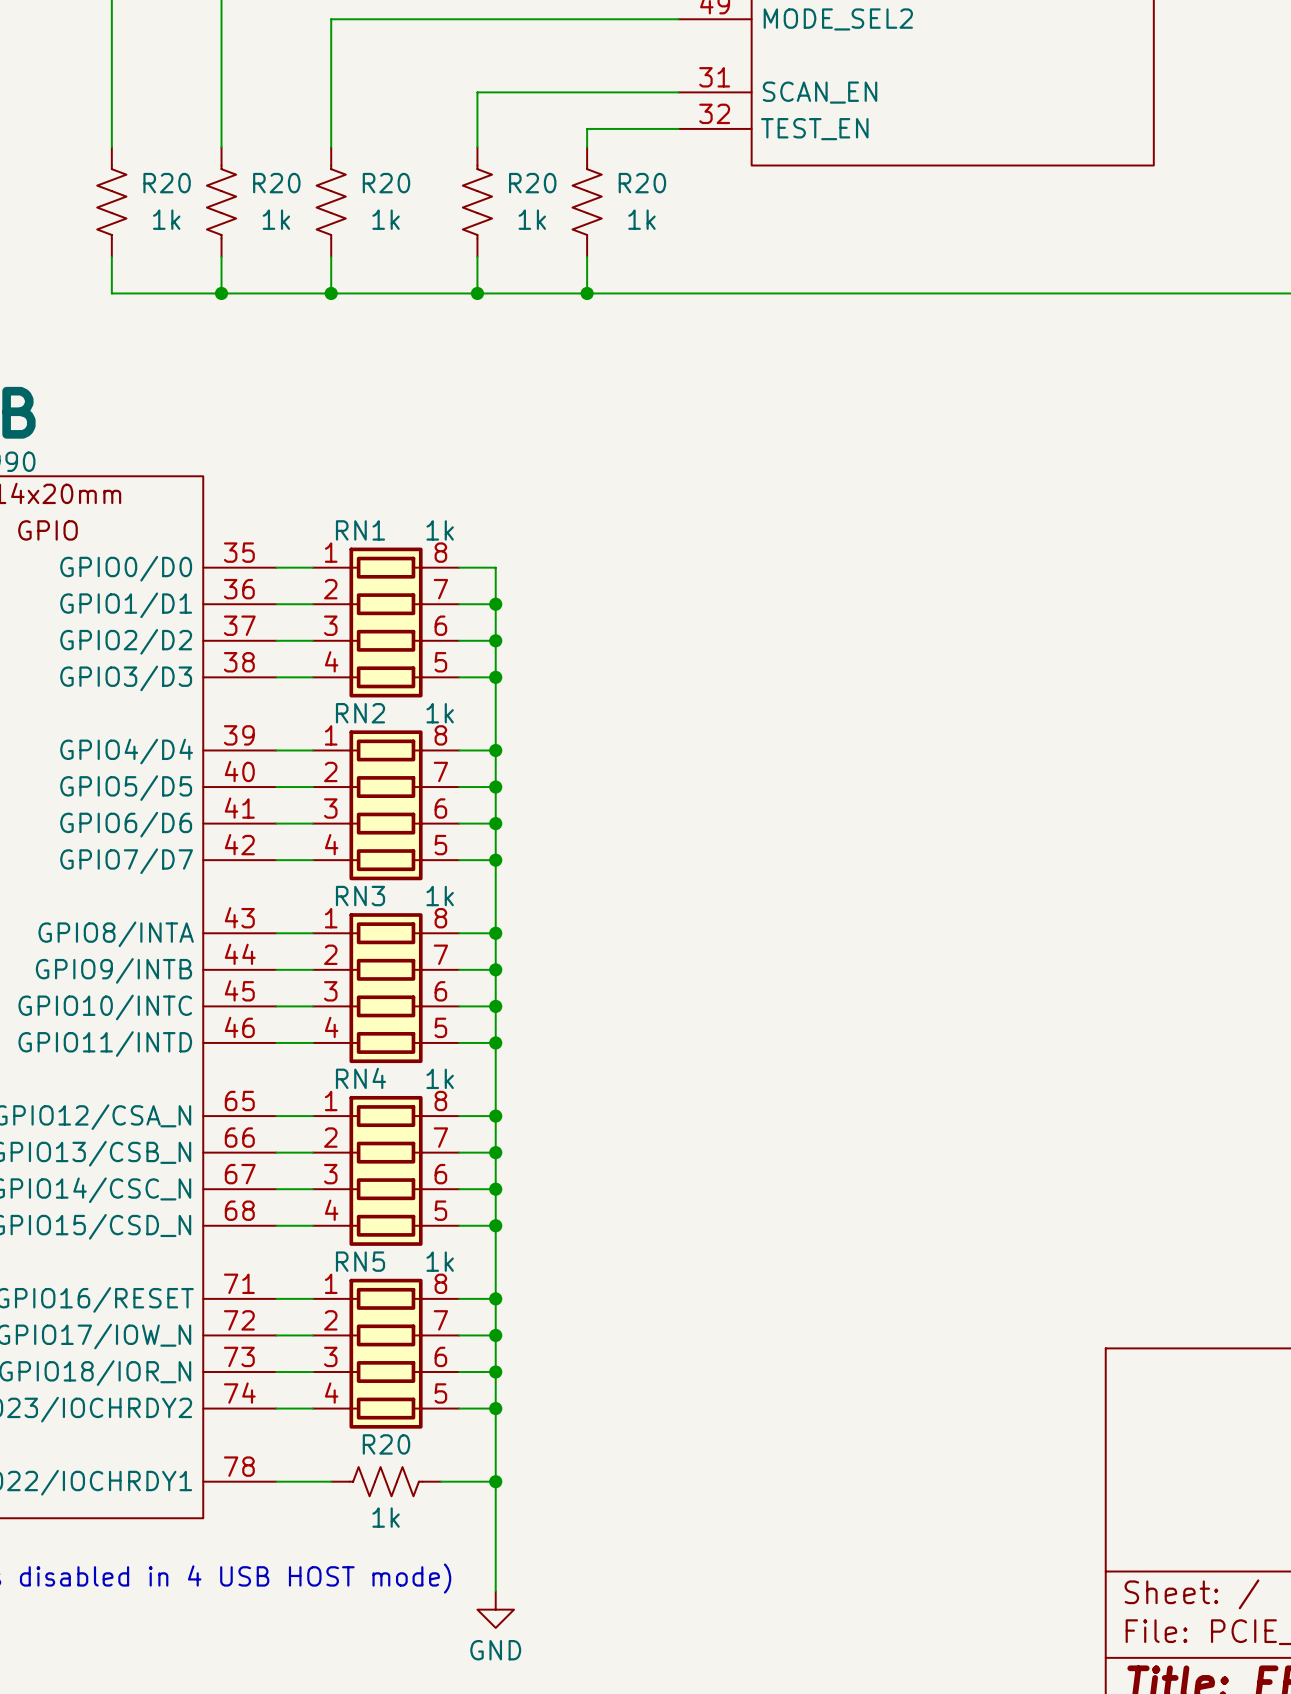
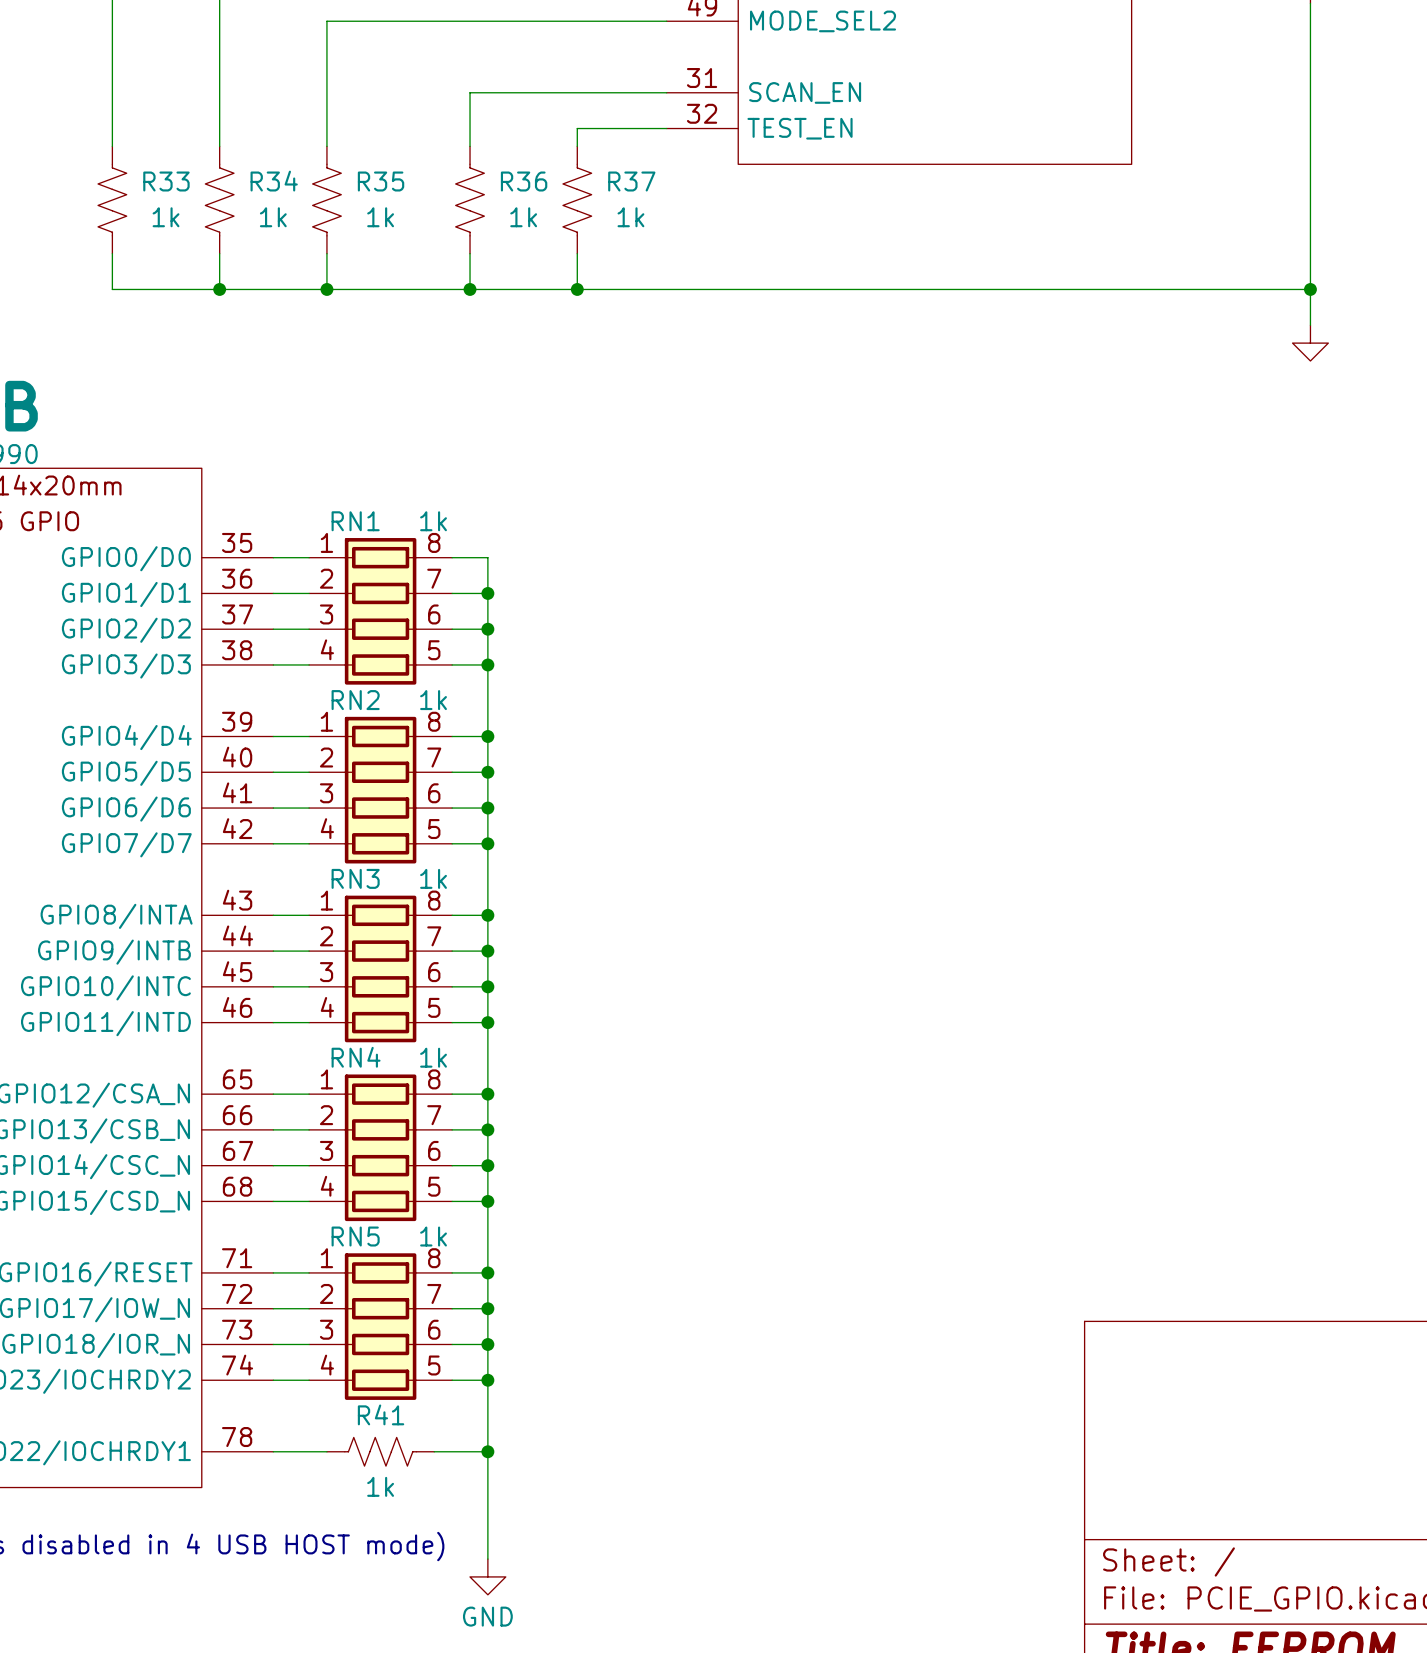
R20 name: R20 (167, 183) -> R33 (166, 181)
R20 name: R20 (276, 183) -> R34 (274, 181)
R20 name: R20 (386, 183) -> R35 (381, 181)
R20 name: R20 (532, 183) -> R36 (524, 181)
R20 name: R20 (642, 183) -> R37 (631, 181)
R20 name: R20 (386, 1444) -> R41 (381, 1414)

